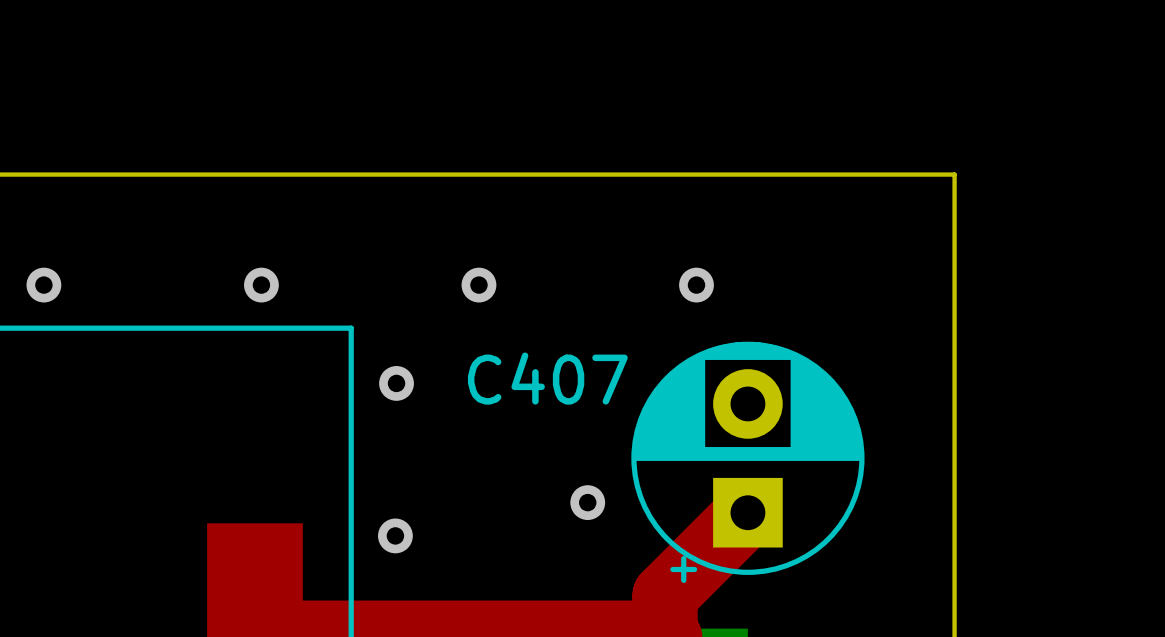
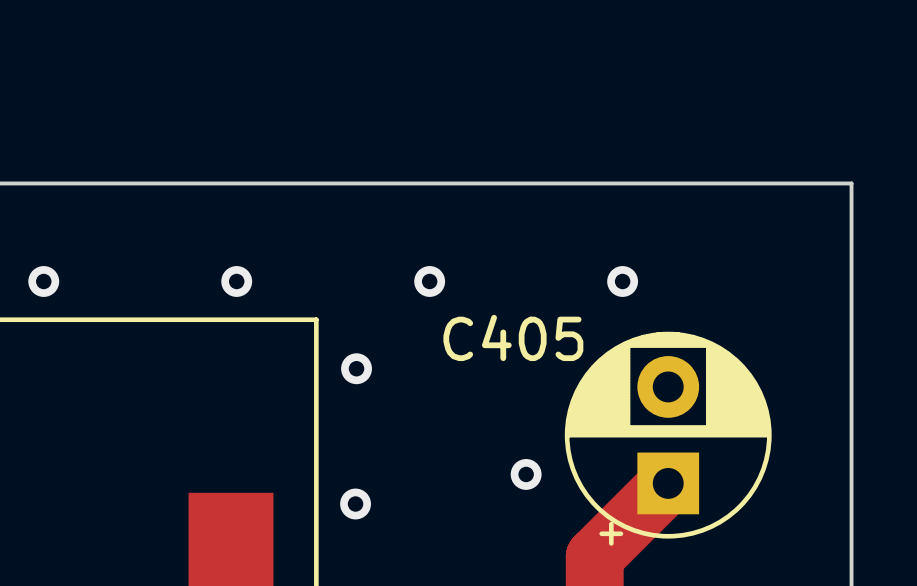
C407 name: C407 (547, 378) -> C405 (513, 337)

